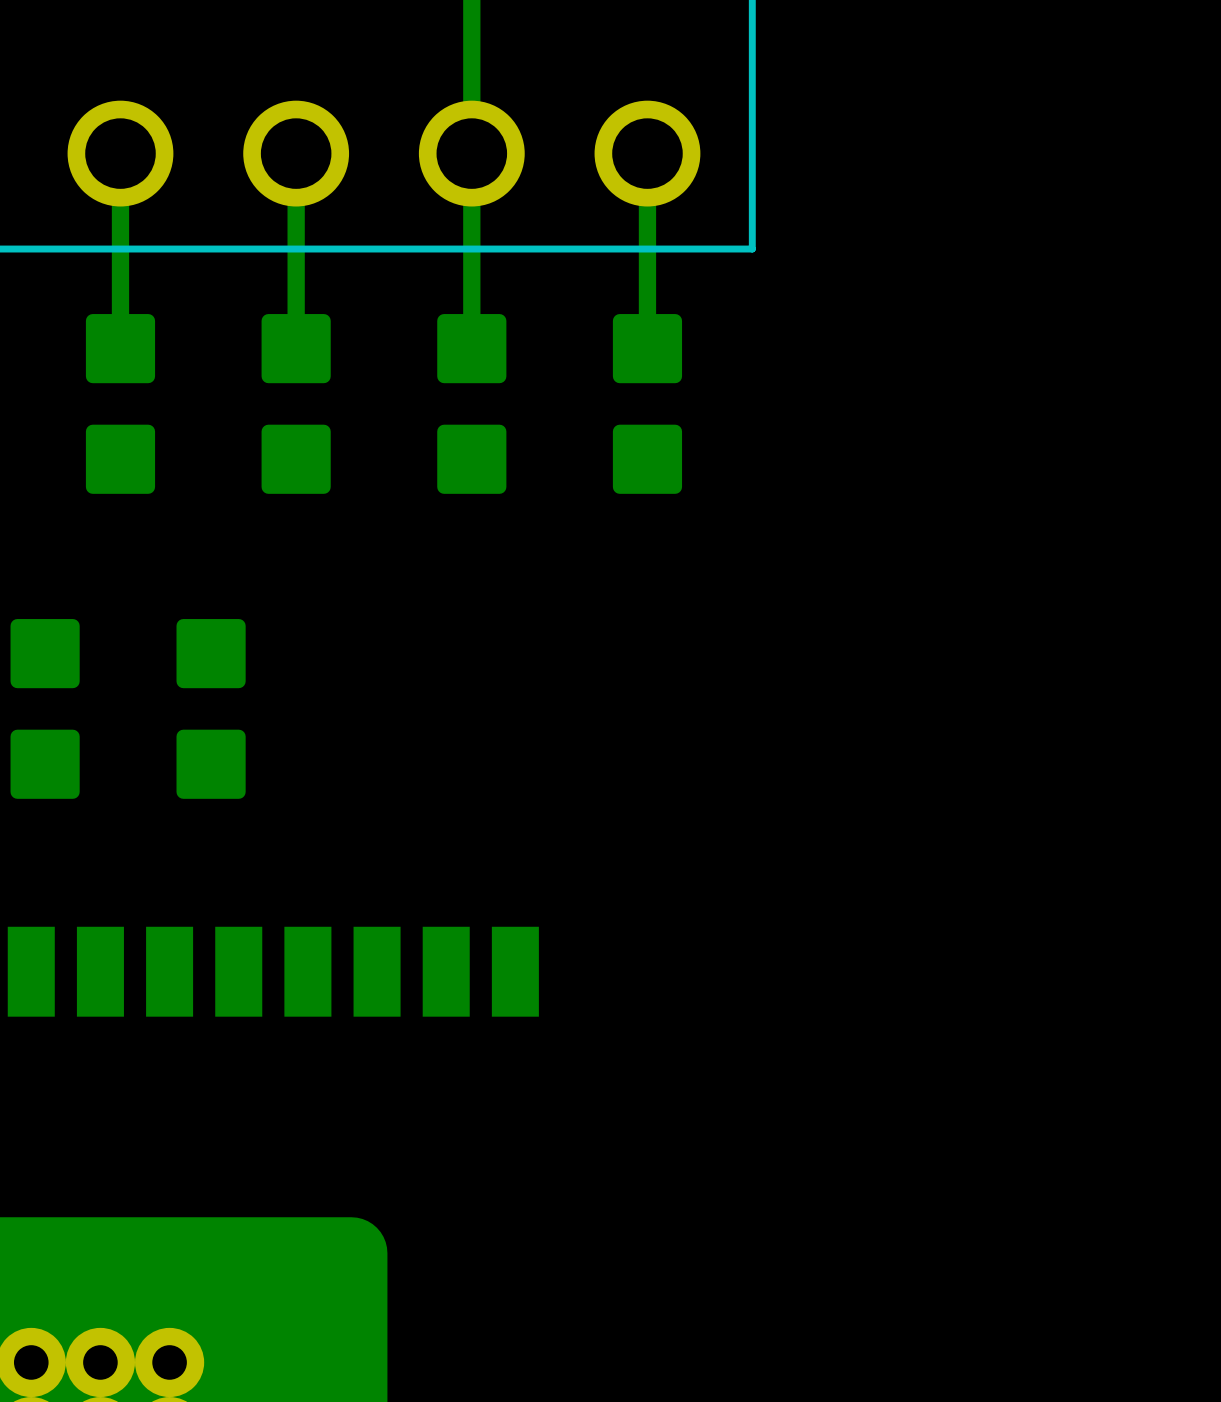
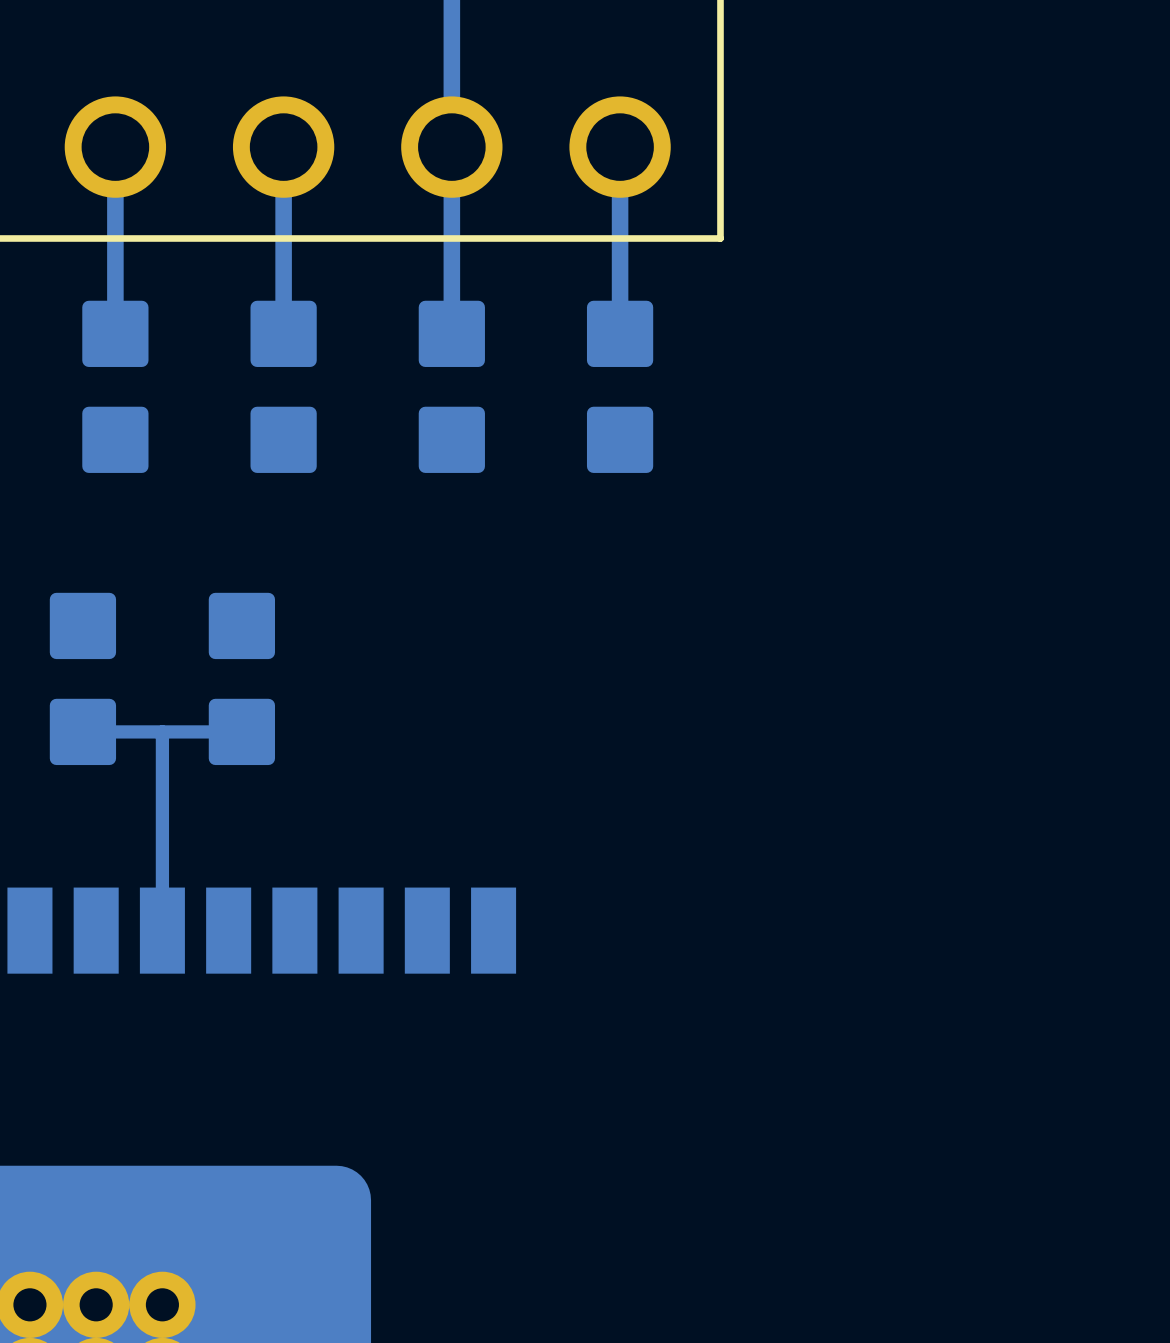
part position: (45, 708) -> (82, 678)
part position: (211, 708) -> (241, 678)
bottom track: none -> (82, 731) (241, 731)
bottom track: none -> (162, 731) (162, 930)

